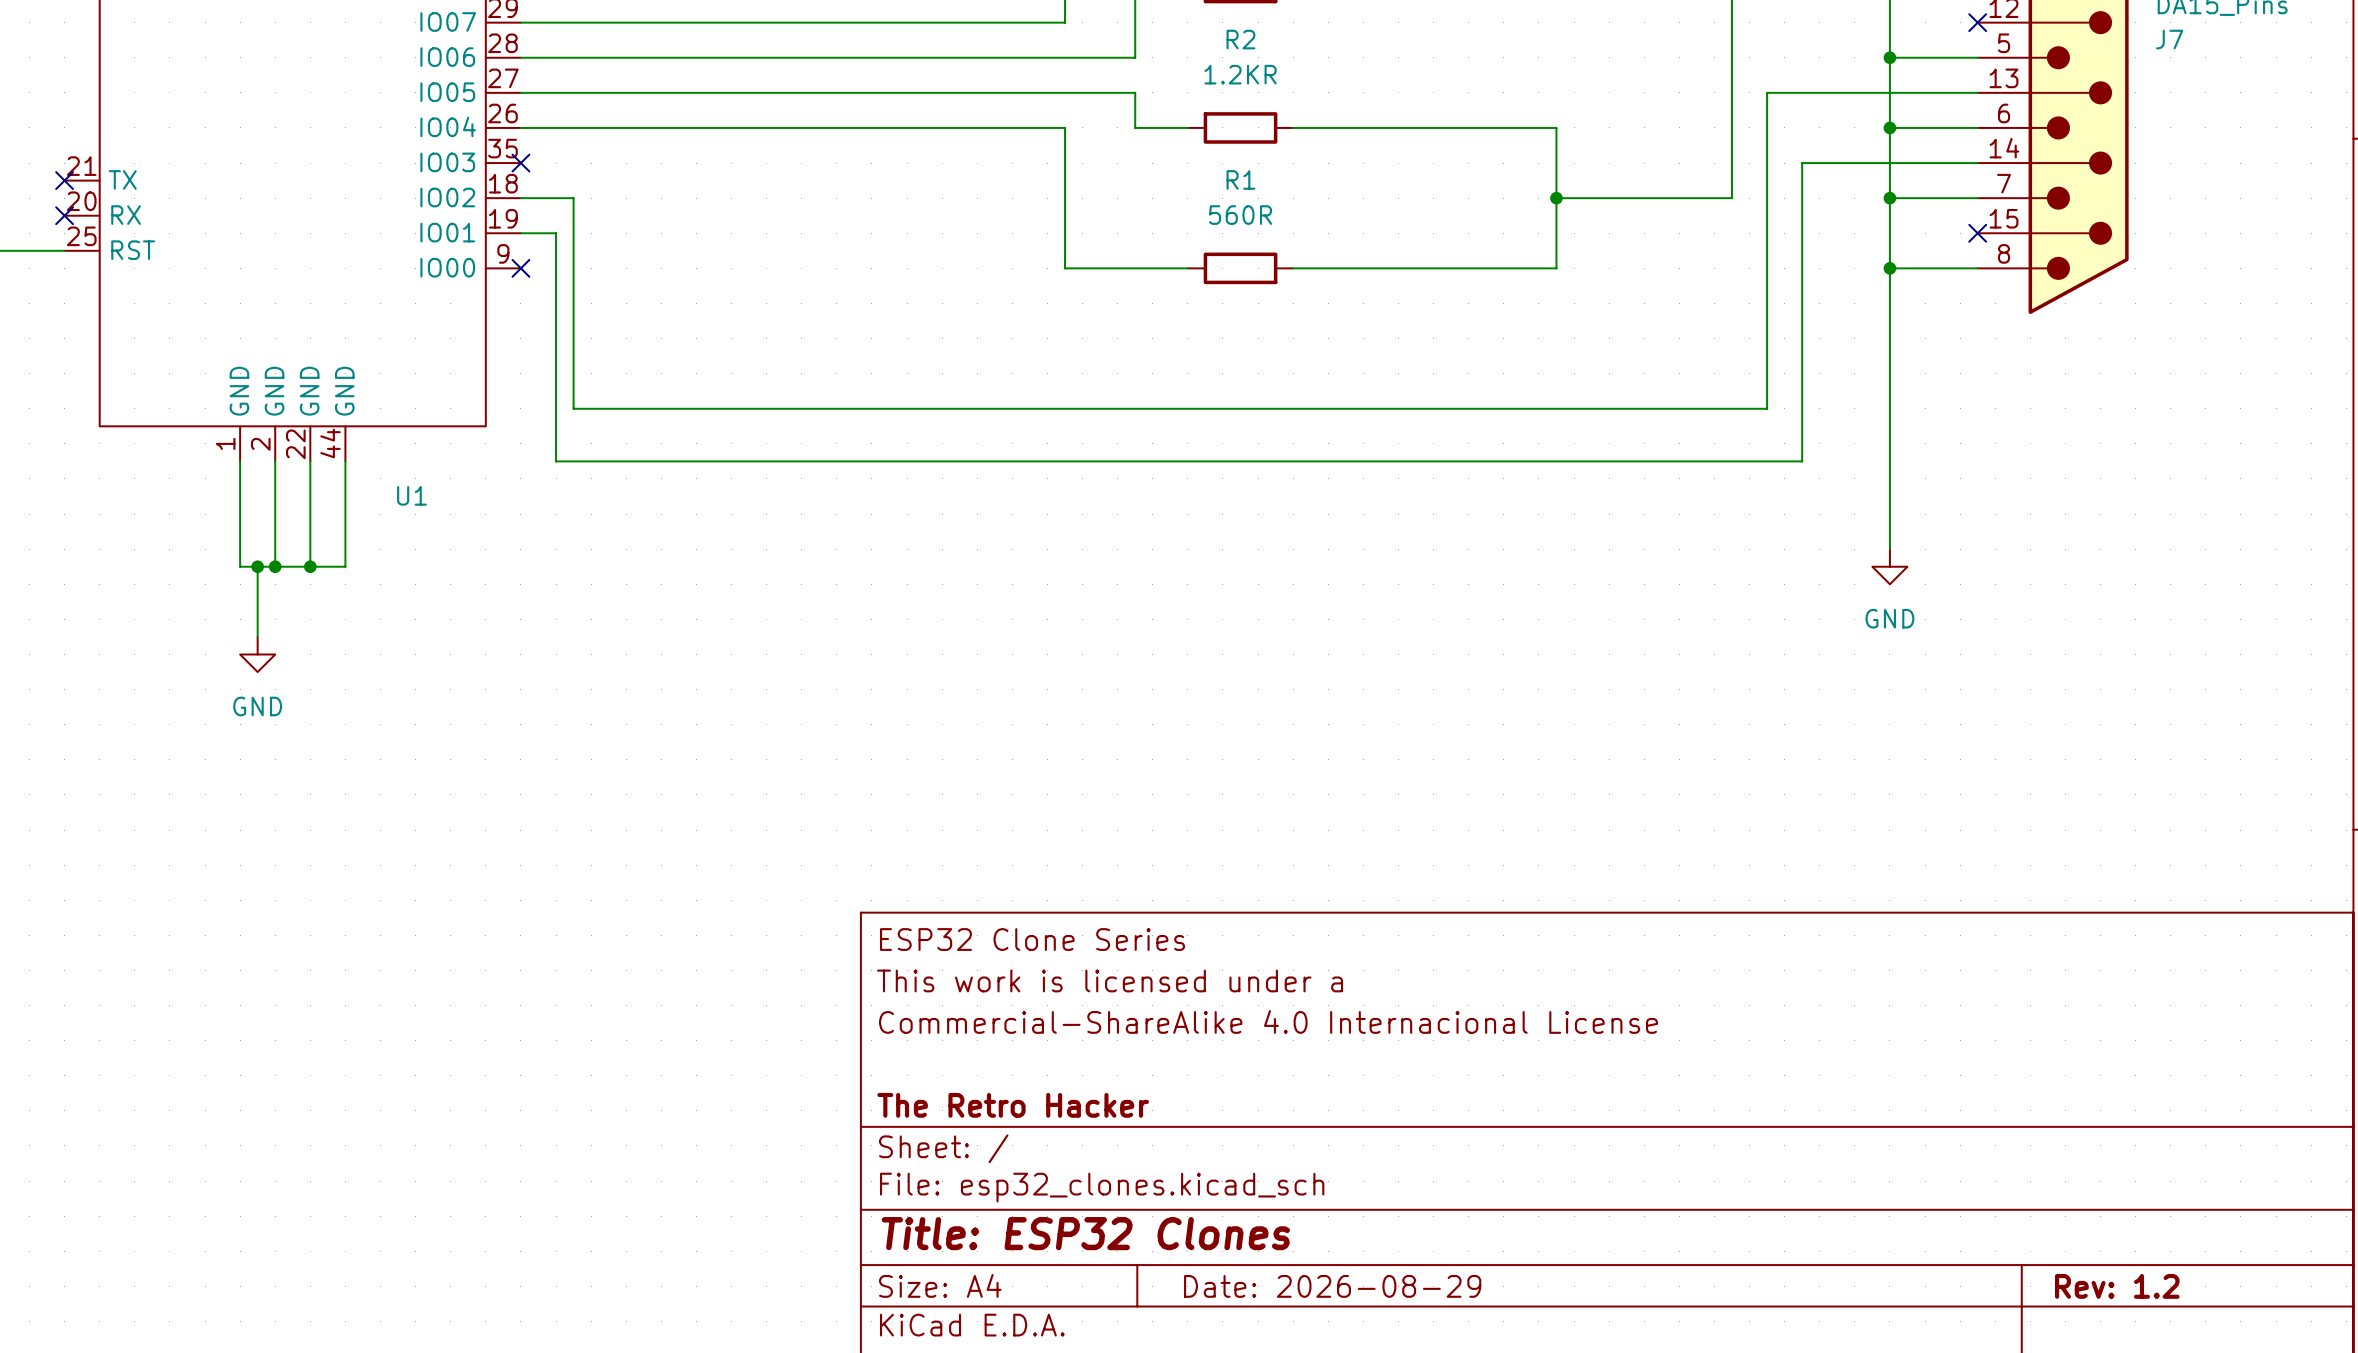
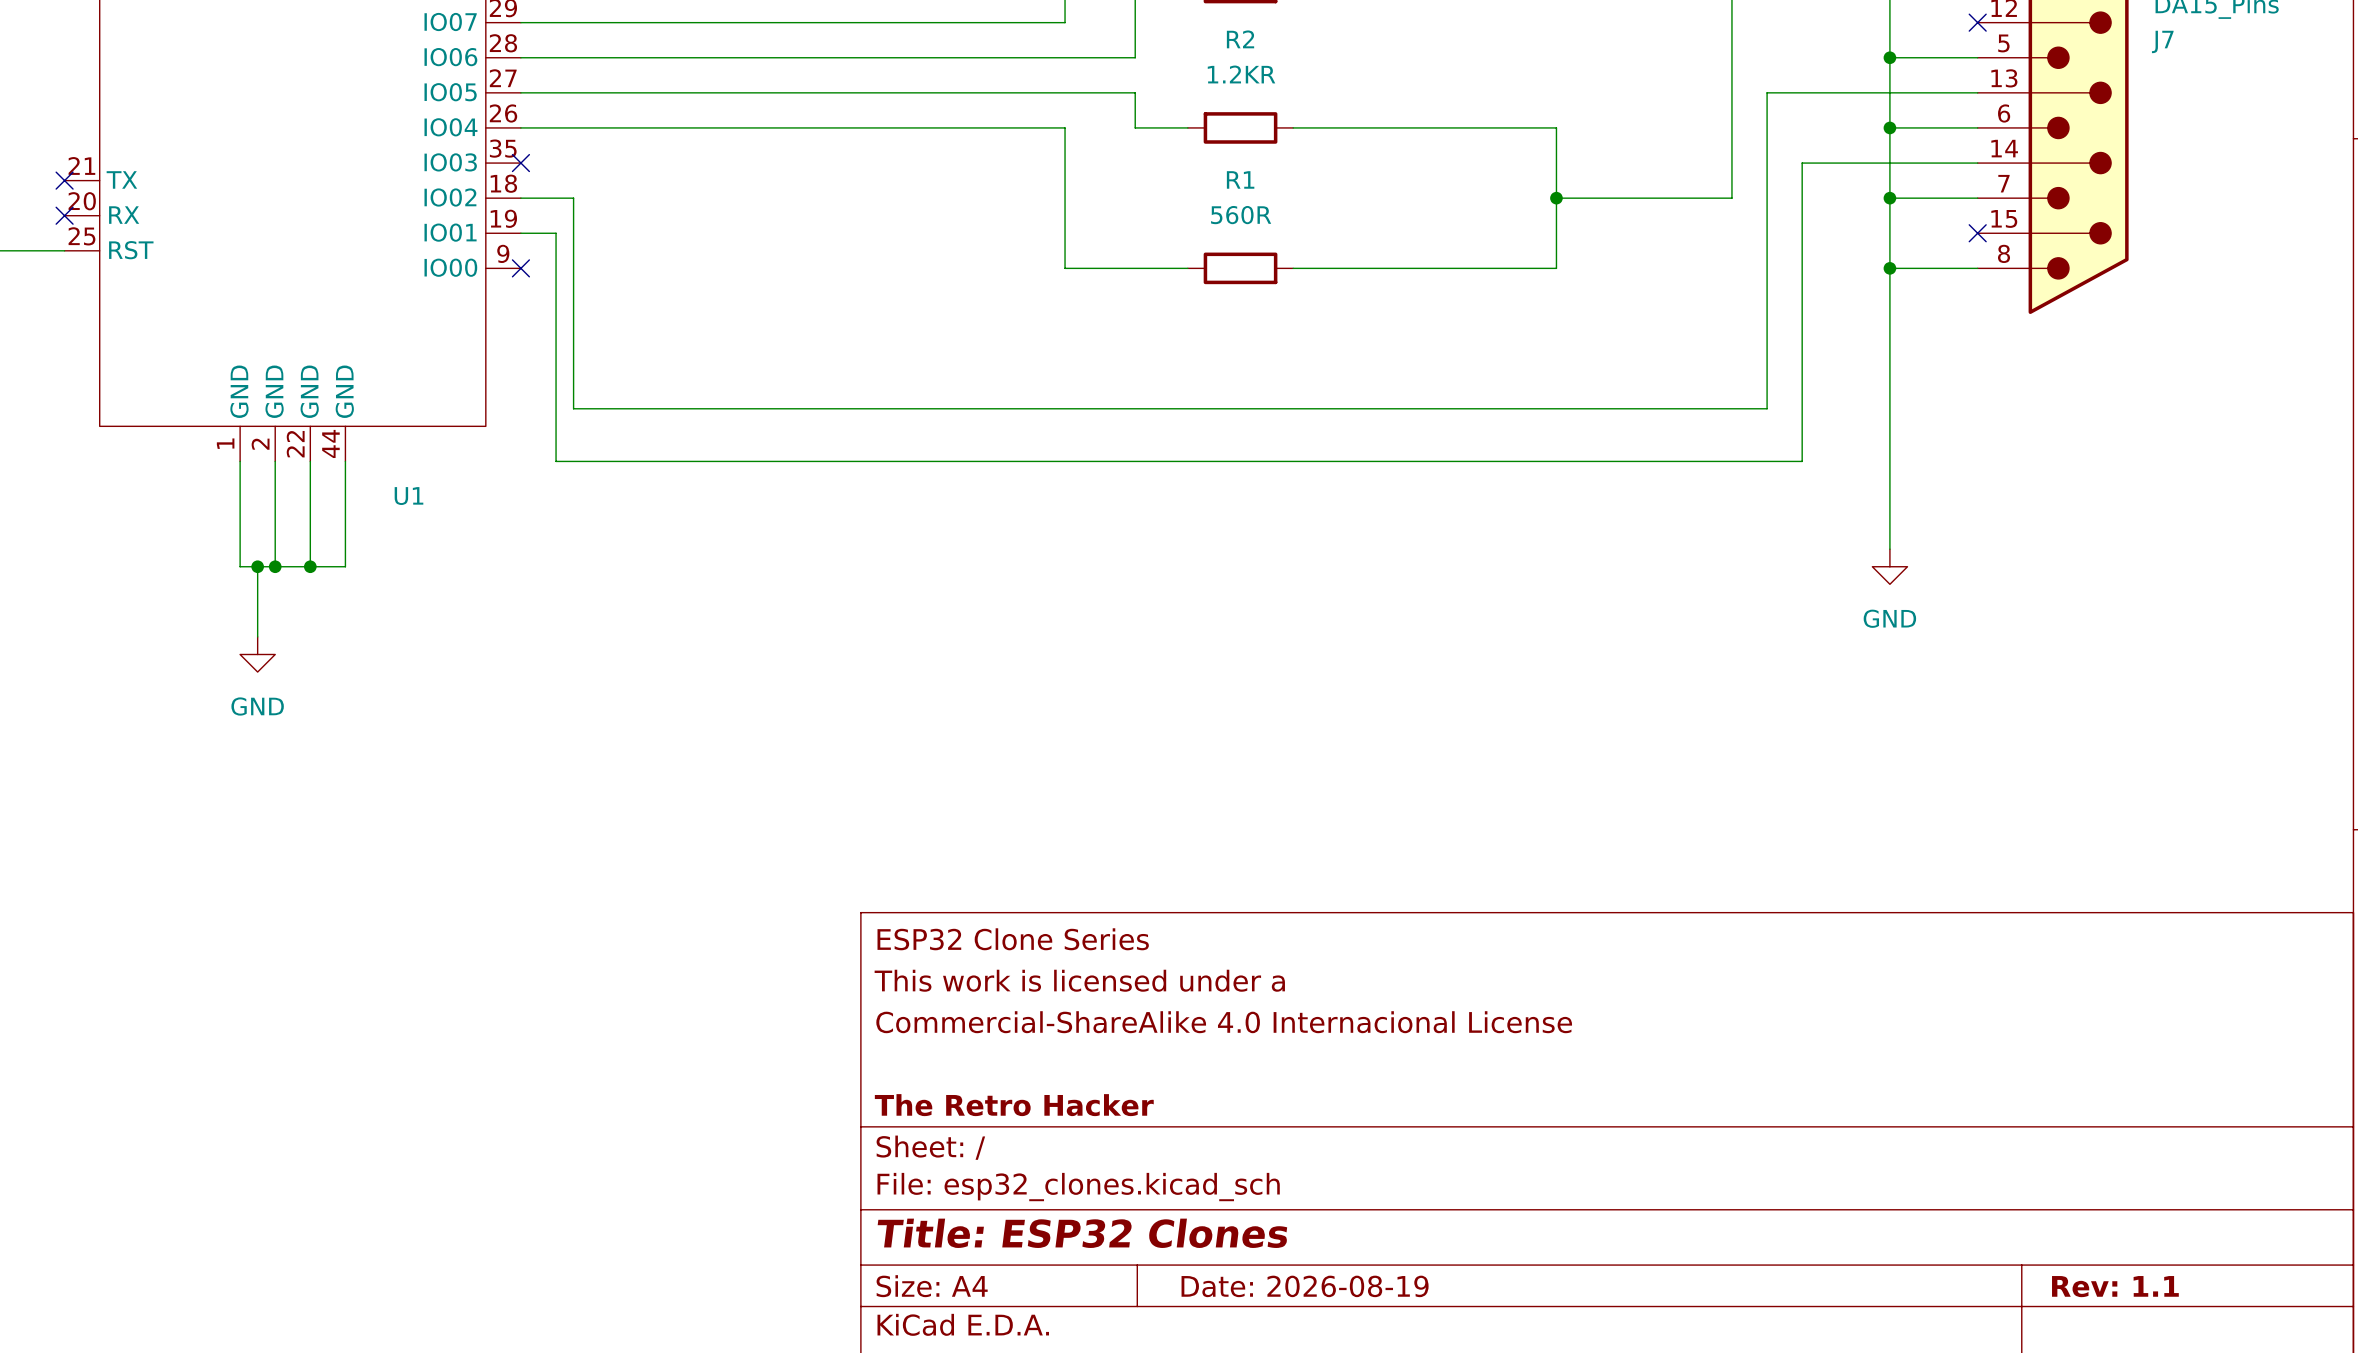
title block: Date: 2026-08-29 (1332, 1286) -> Date: 2026-08-19 (1305, 1286)
title block: Rev: 1.2 (2117, 1286) -> Rev: 1.1 (2115, 1286)

